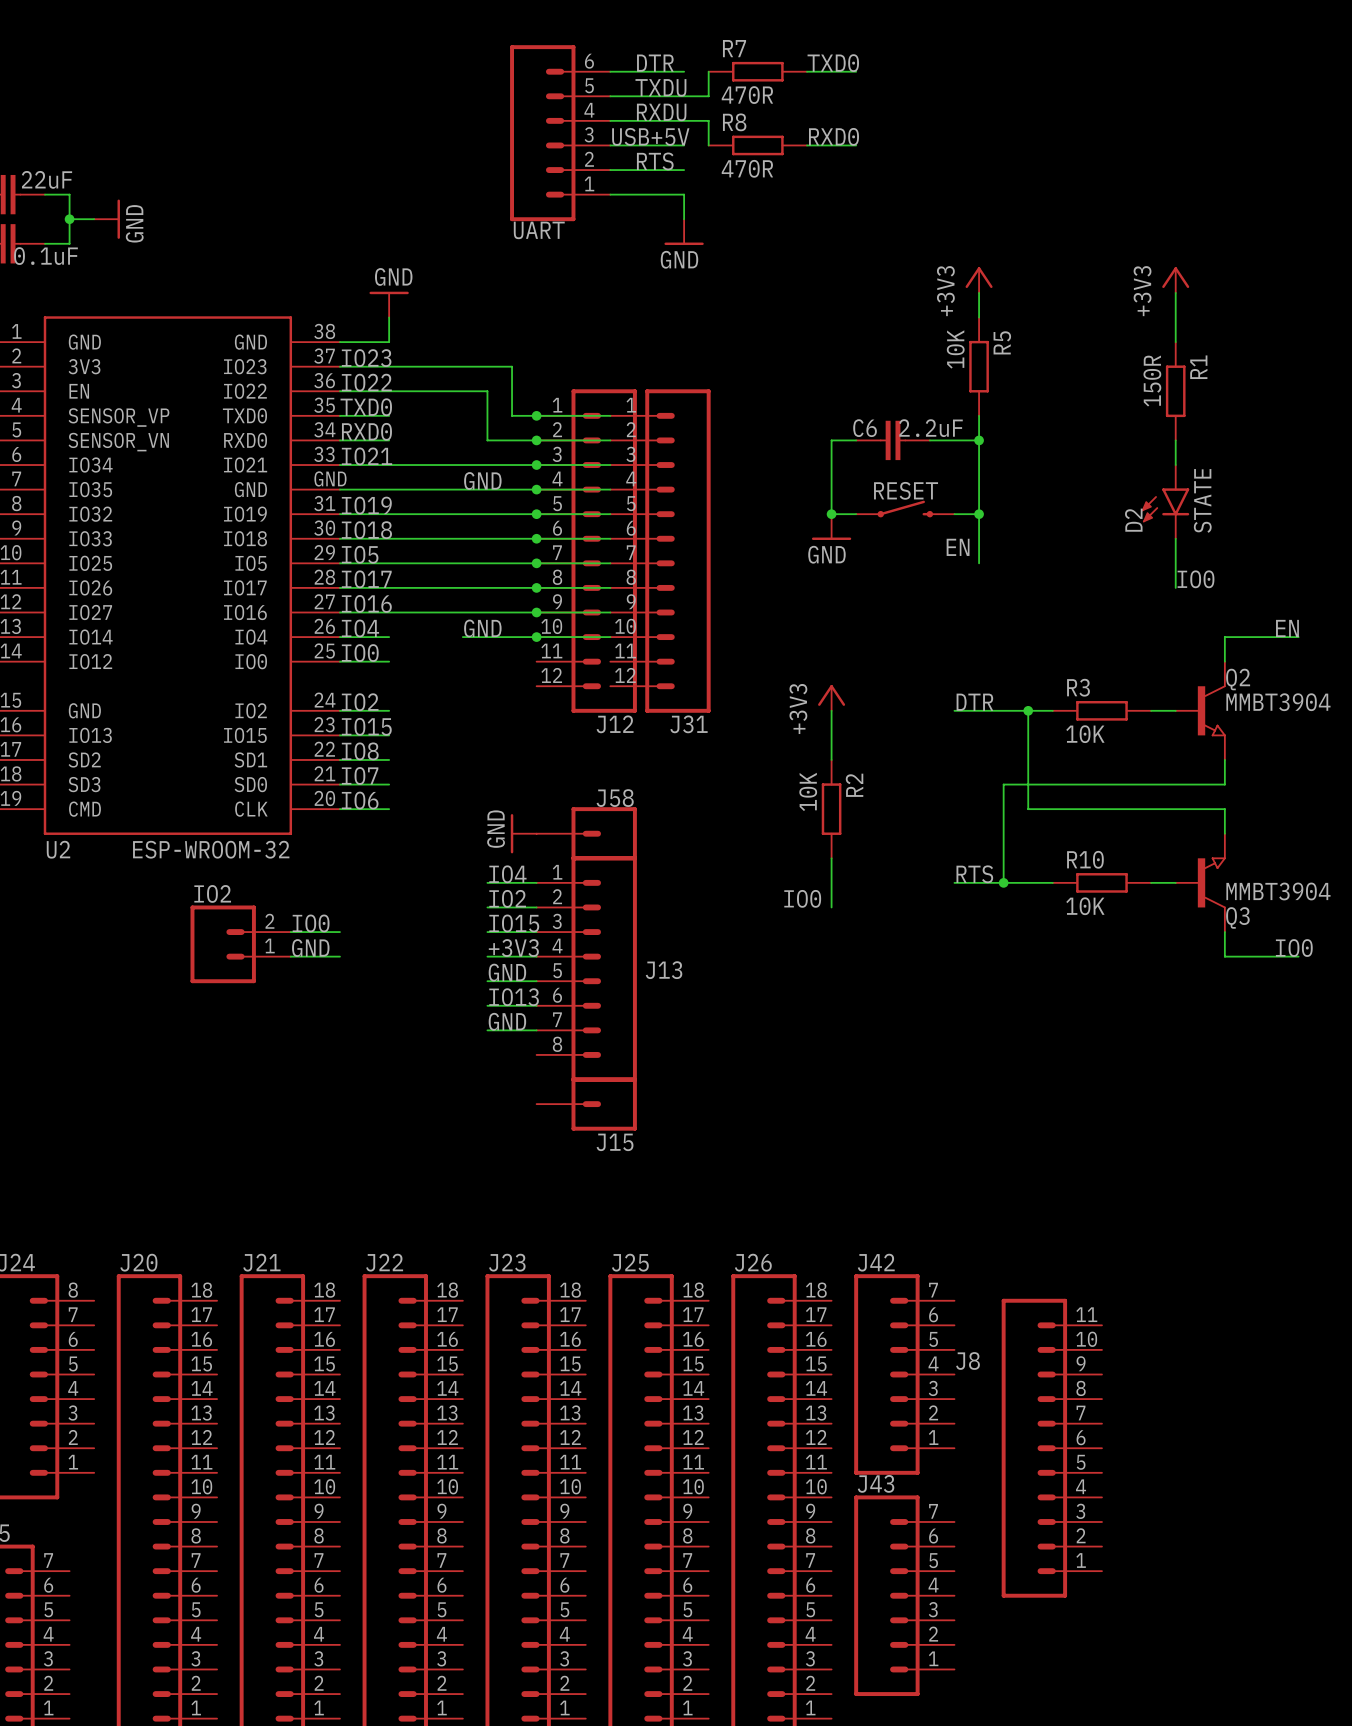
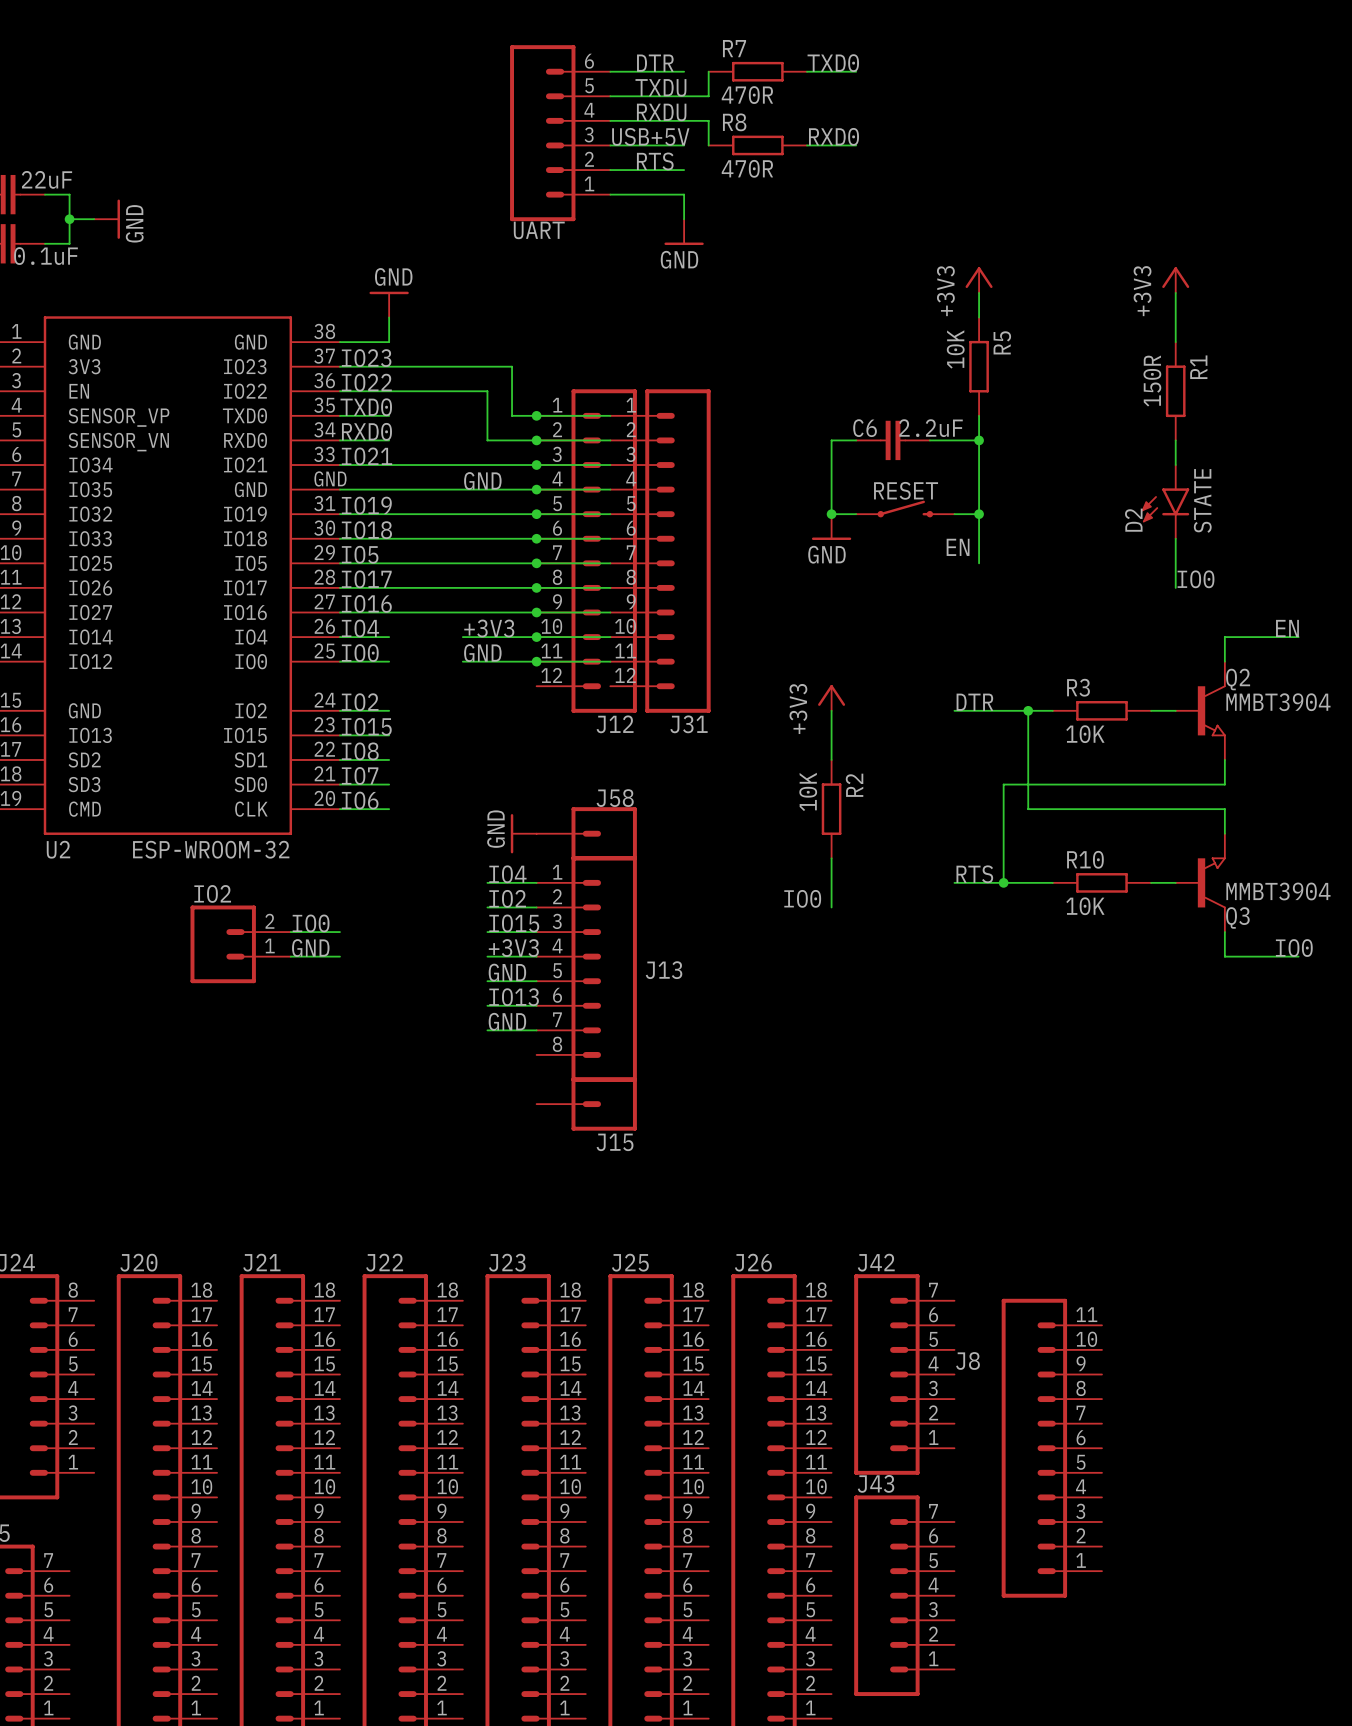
label: GND (482, 628) -> +3V3 (489, 628)
label: none -> GND (482, 653)
wire: none -> (462, 661) (610, 661)
junction: none -> (536, 661)

